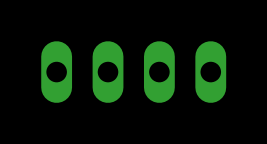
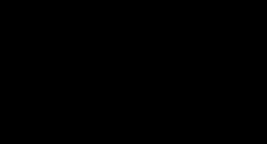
part: (133, 72) -> none

